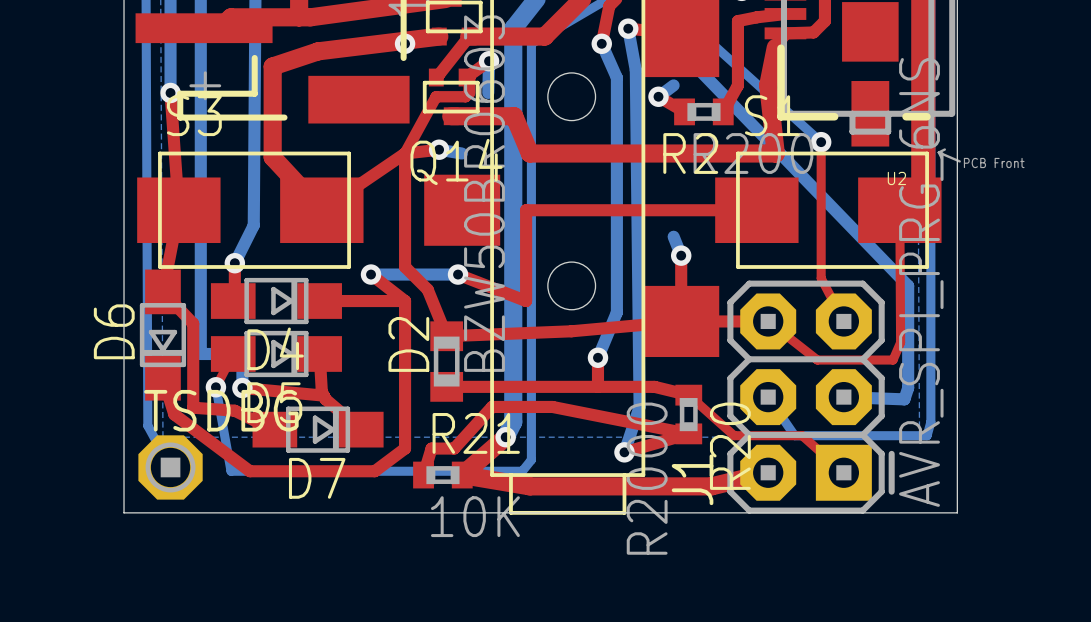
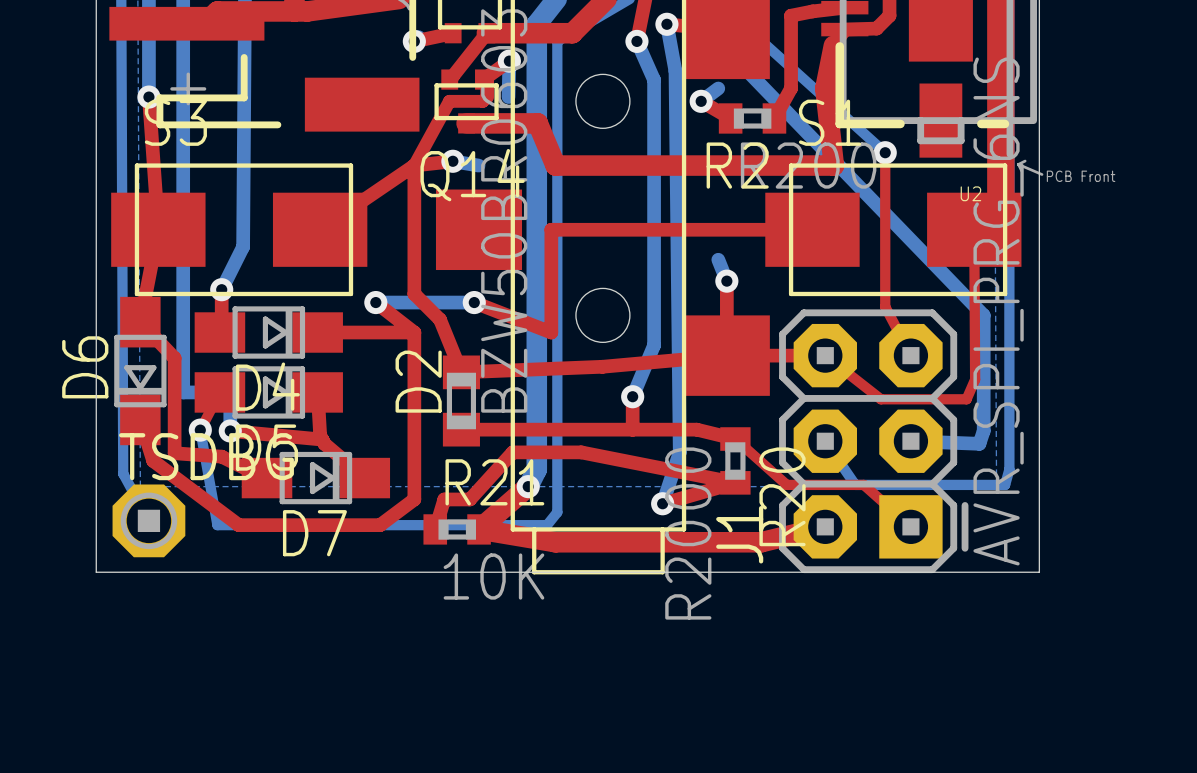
top track: (439, 36) (318, 51) (272, 66) (272, 157) (321, 210) -> none

